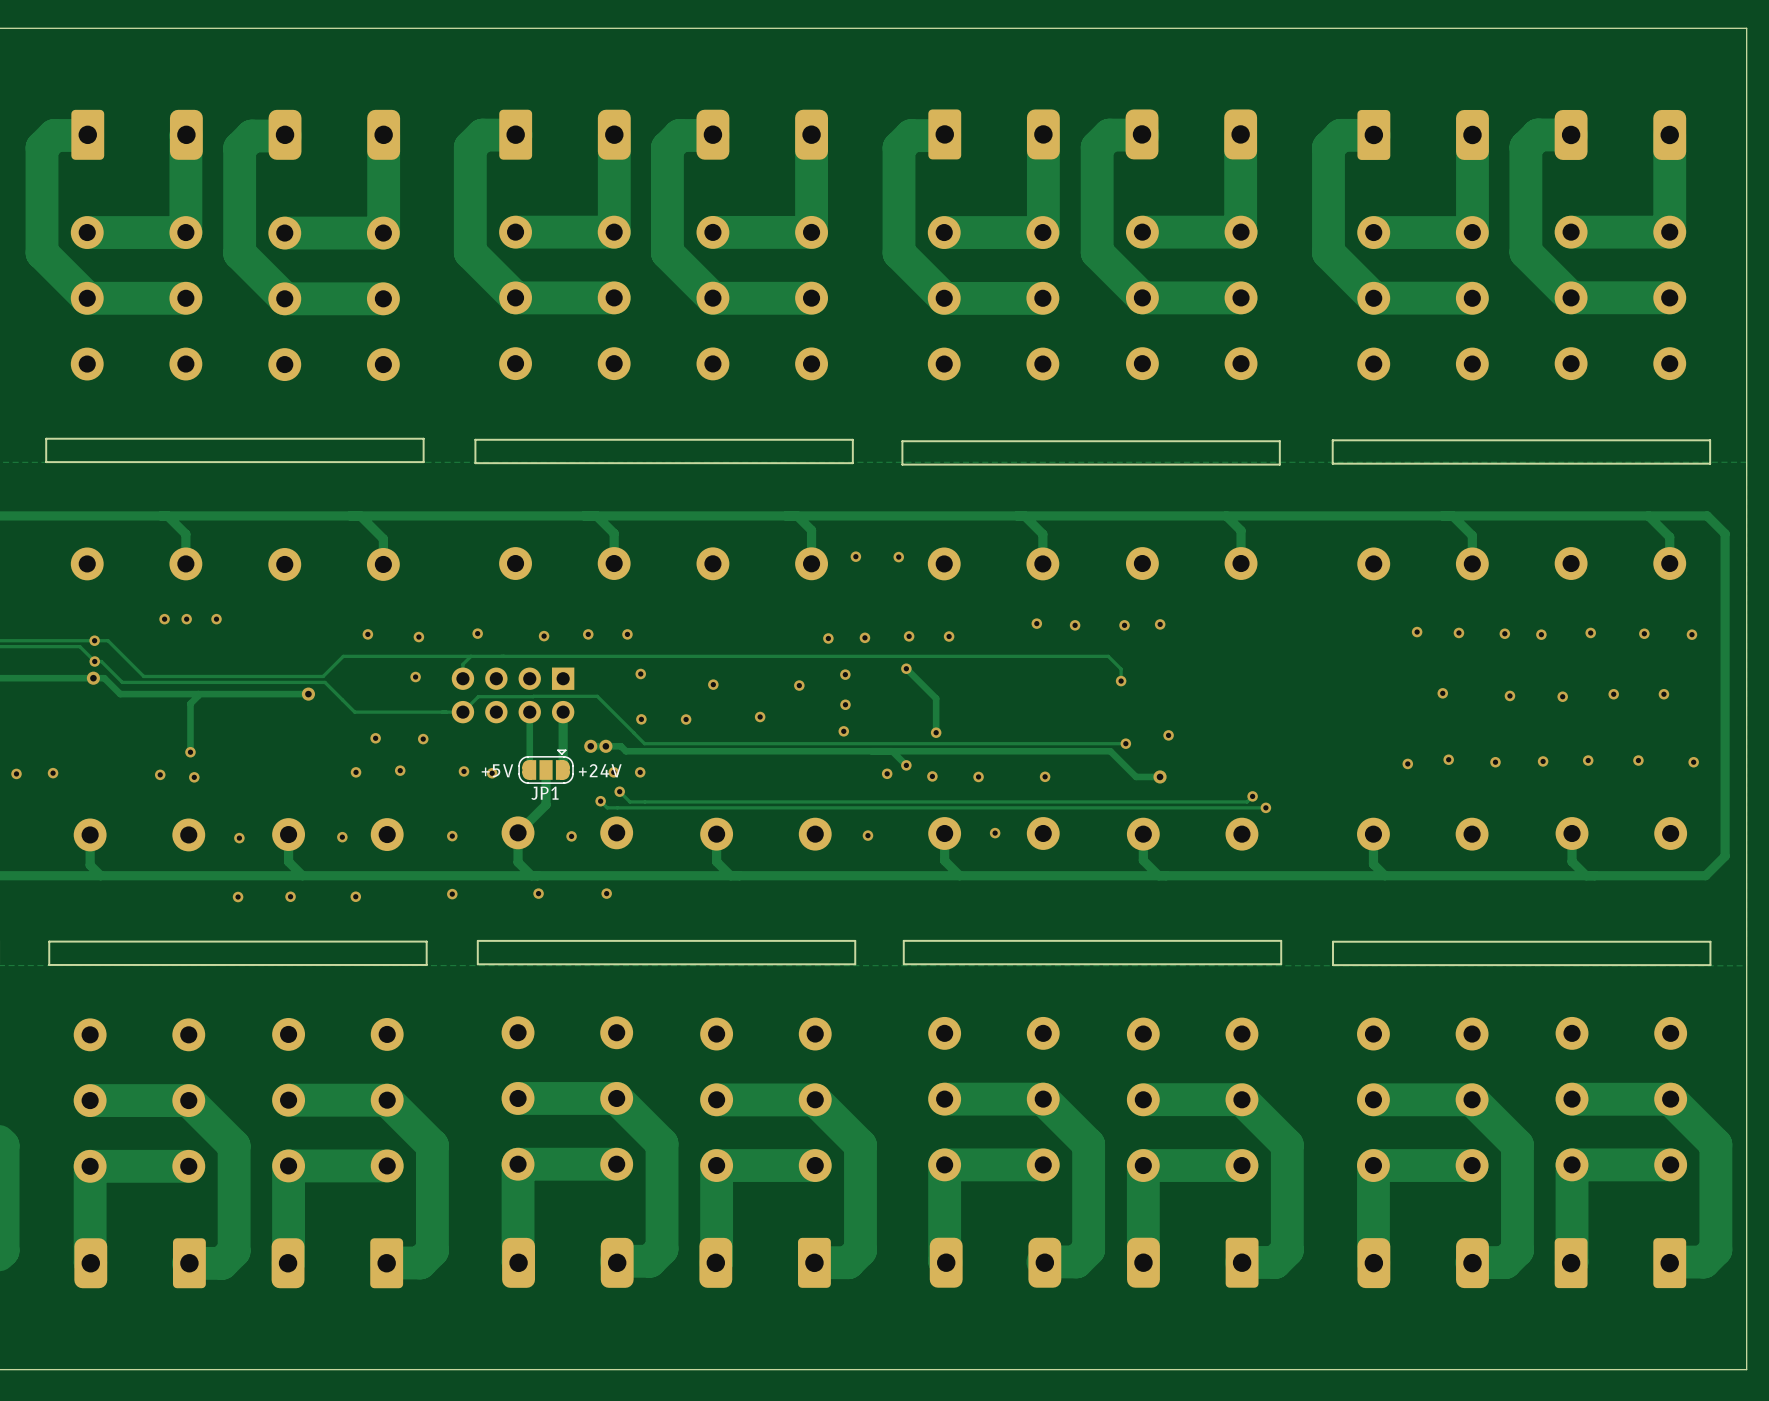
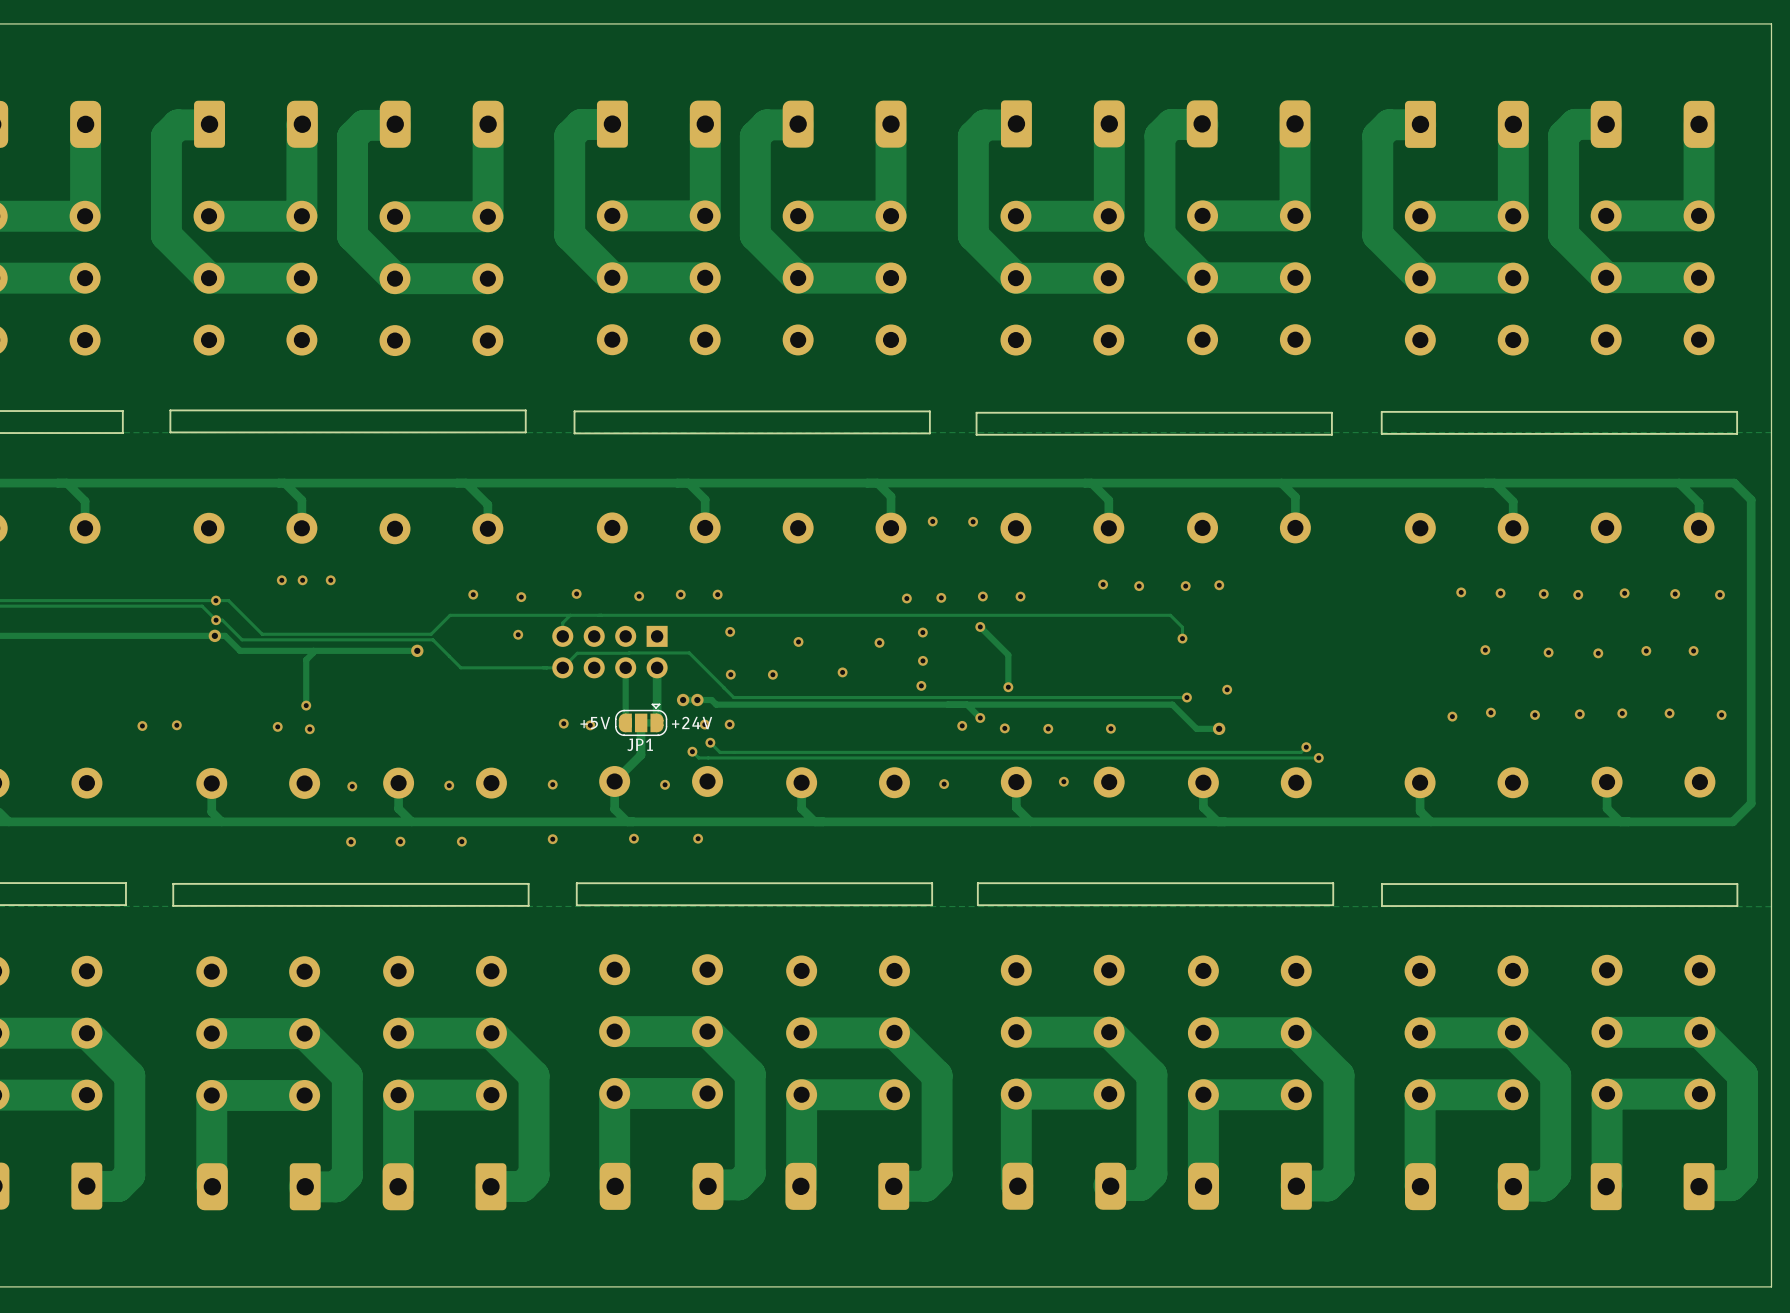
via: (375, 738) -> none
via: (423, 739) -> none
JP1 footprint: [518, 749, 574, 784] -> [615, 703, 668, 737]
via: (400, 770) -> none
via: (356, 772) -> none

